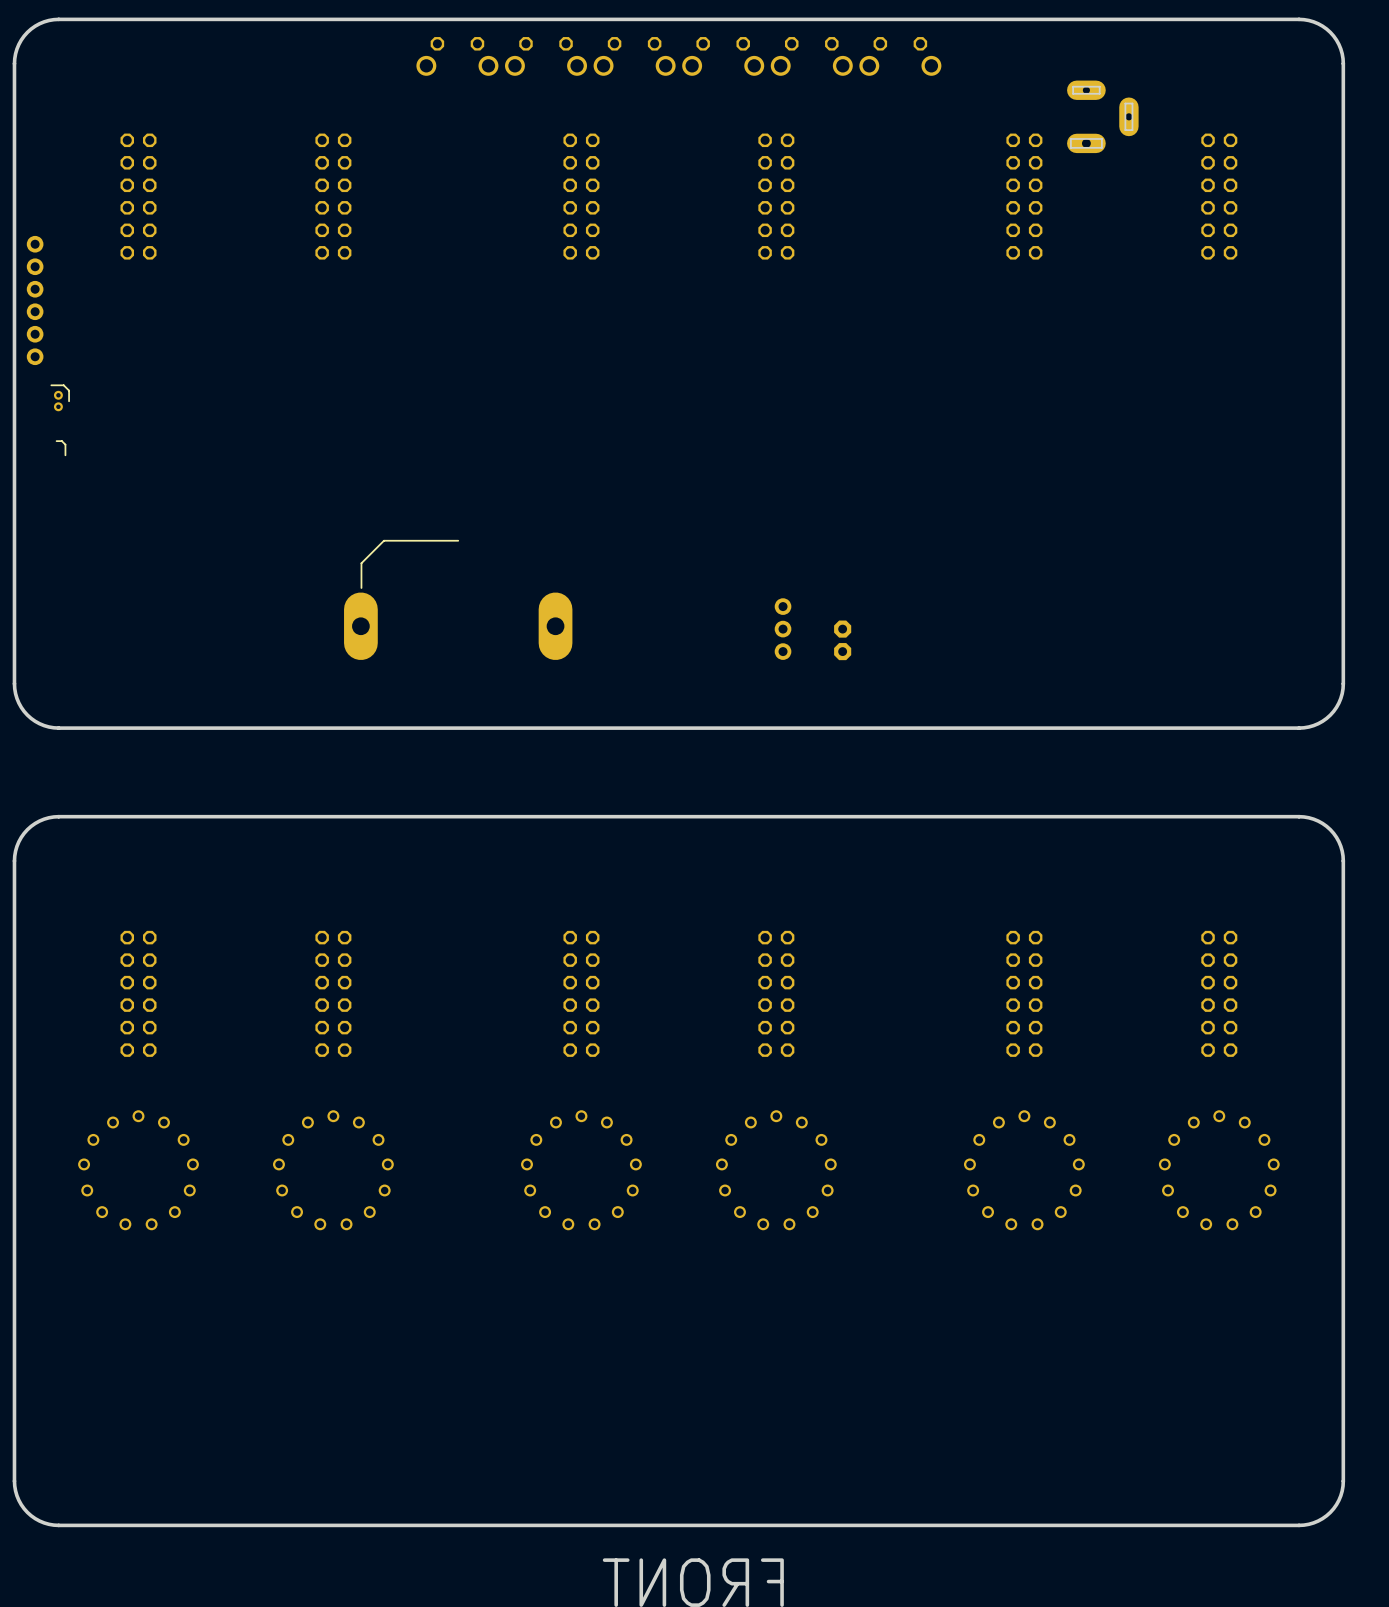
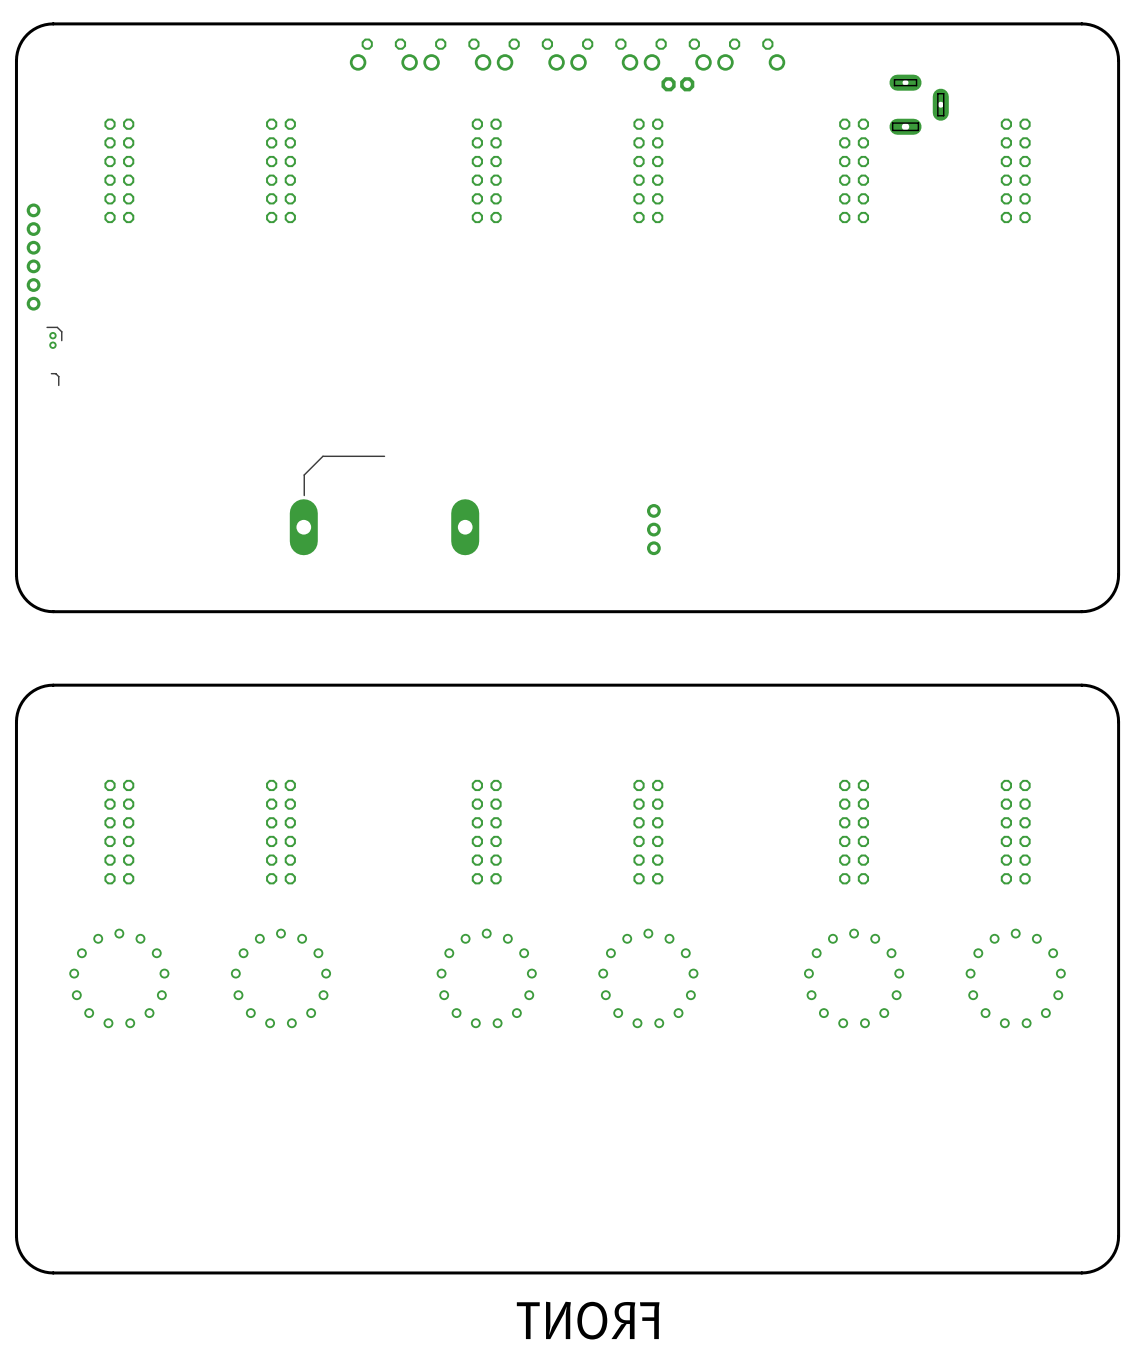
part: none -> (677, 84)
part: (842, 640) -> none

